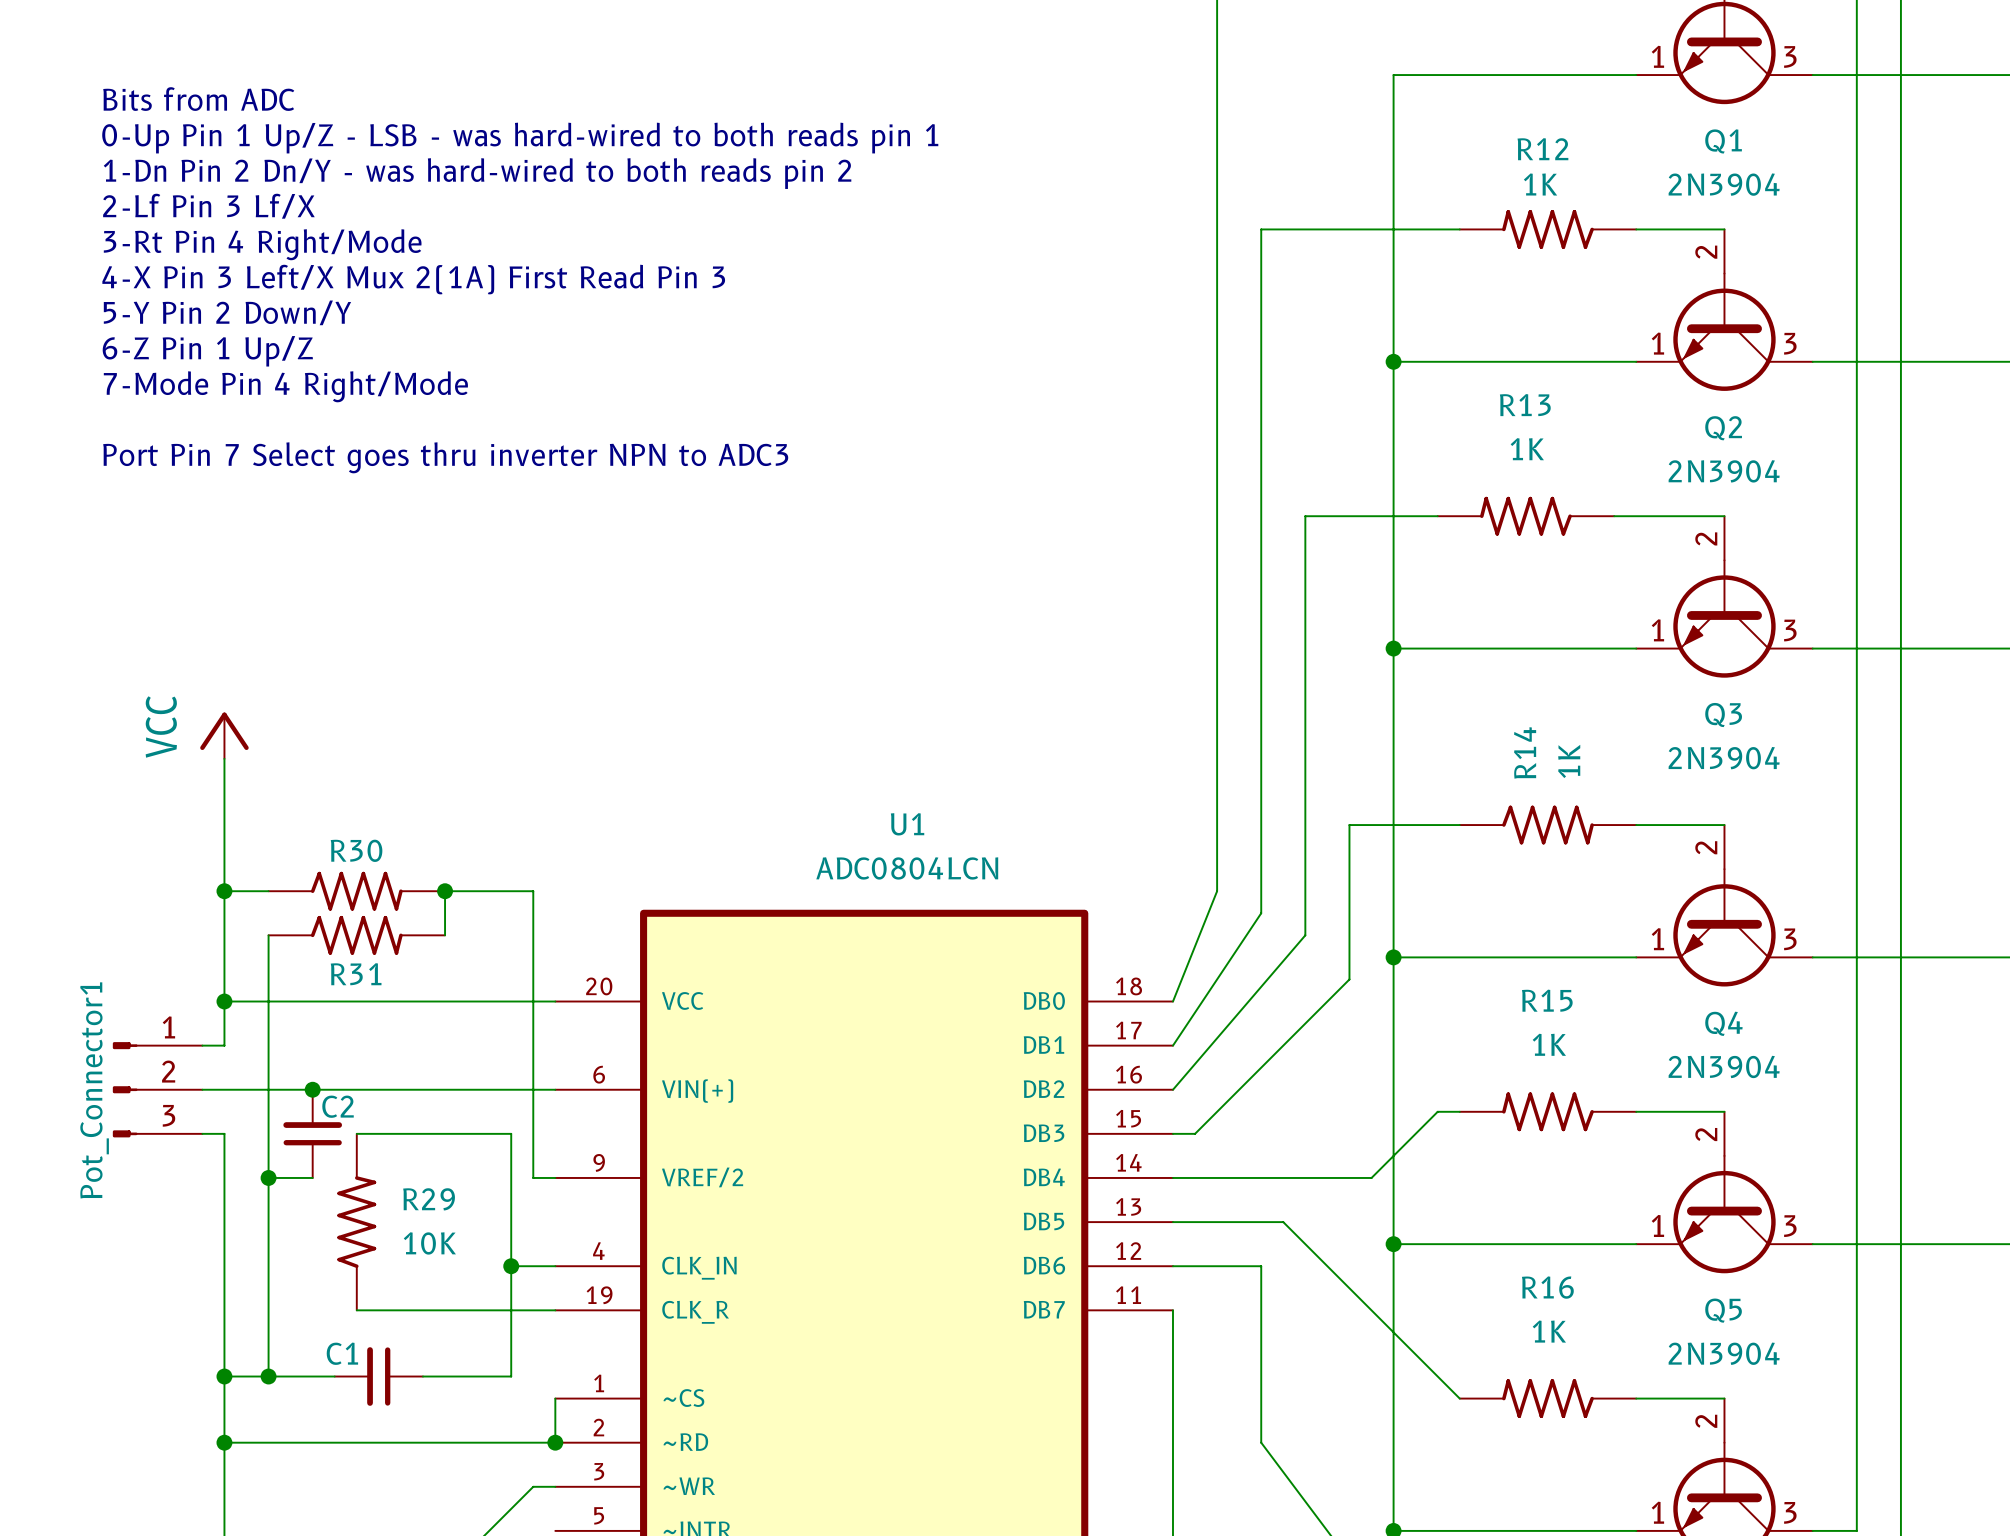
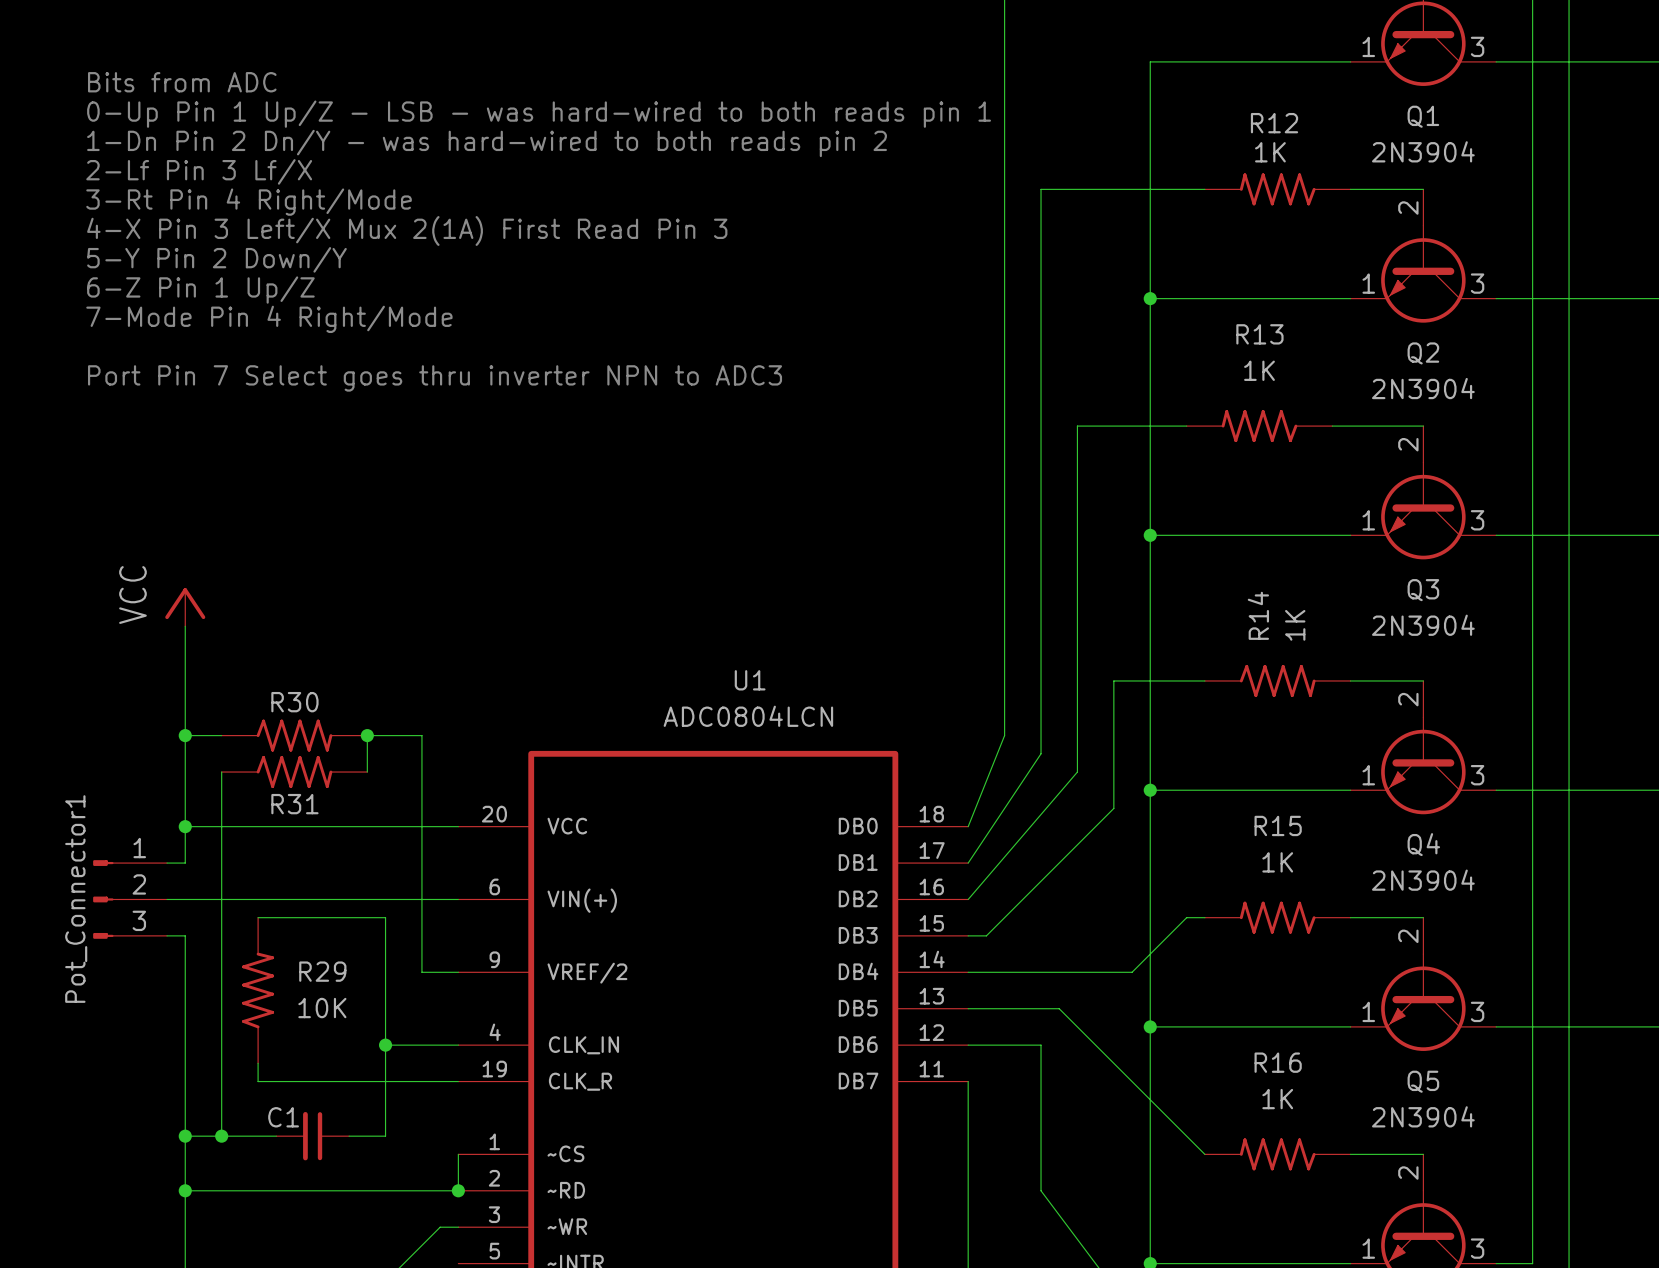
wire: (511, 891) (533, 891) (533, 1177) -> (421, 735) (421, 935)
junction: (312, 1089) -> none
C2: (312, 1133) -> none
wire: (356, 1133) (511, 1133) -> none
wire: (268, 1177) (312, 1177) -> (385, 1045) (421, 1045)
junction: (268, 1177) -> none
wire: (511, 1177) (511, 1376) (467, 1376) -> (258, 917) (385, 917) (385, 1136)
wire: none -> (421, 972) (440, 972)
R29 position: (356, 1222) -> (258, 990)
junction position: (511, 1266) -> (385, 1045)
wire: none -> (258, 1063) (258, 1081) (294, 1081)

